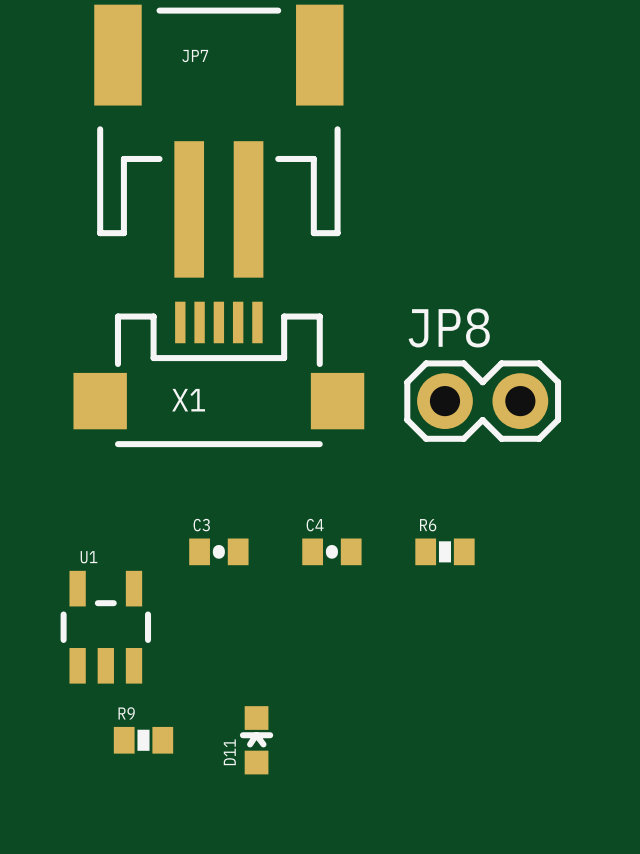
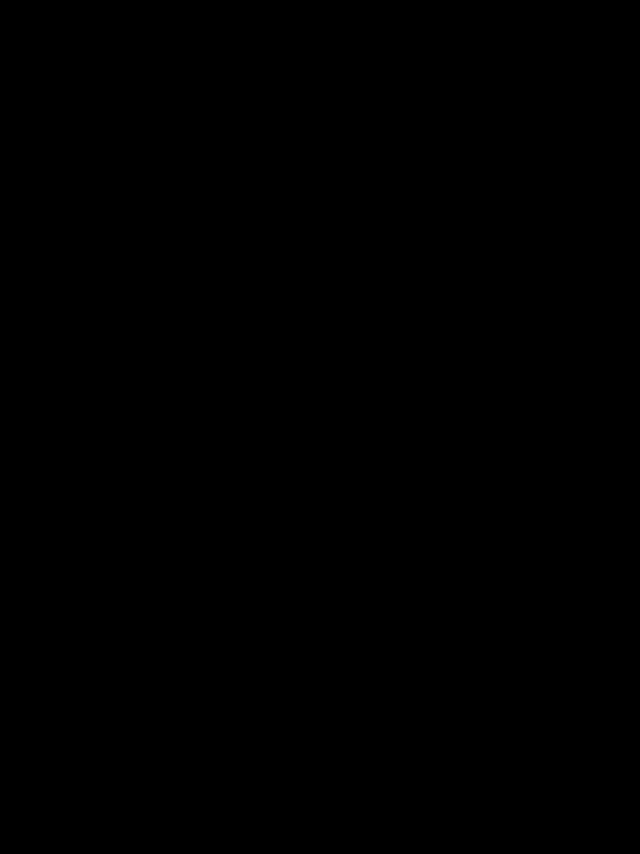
JP7: (218, 141) -> none
X1: (218, 374) -> none
JP8: (482, 401) -> none
C3: (218, 551) -> none
C4: (331, 551) -> none
R6: (444, 551) -> none
U1: (105, 627) -> none
R9: (143, 740) -> none
D11: (256, 740) -> none

